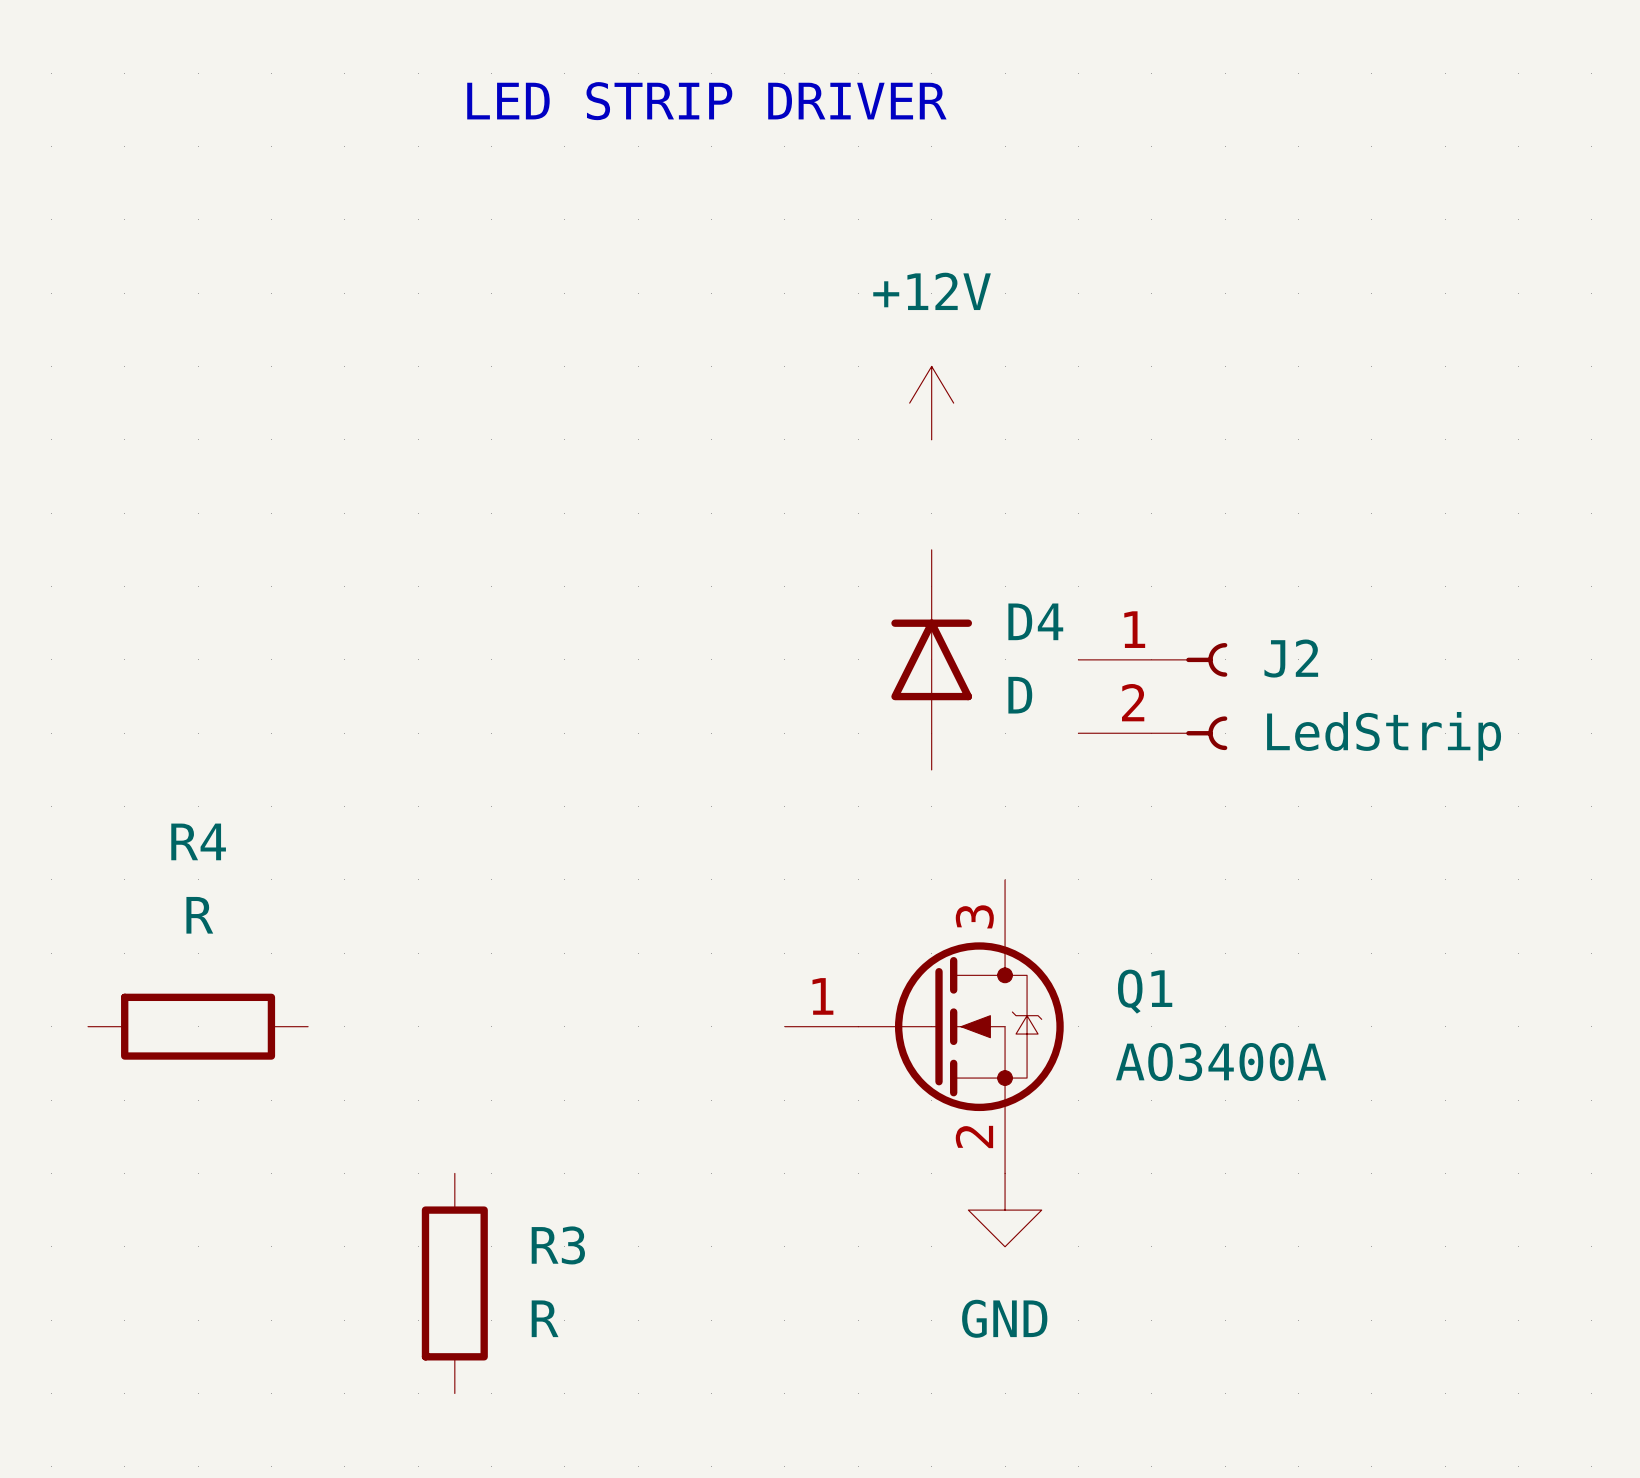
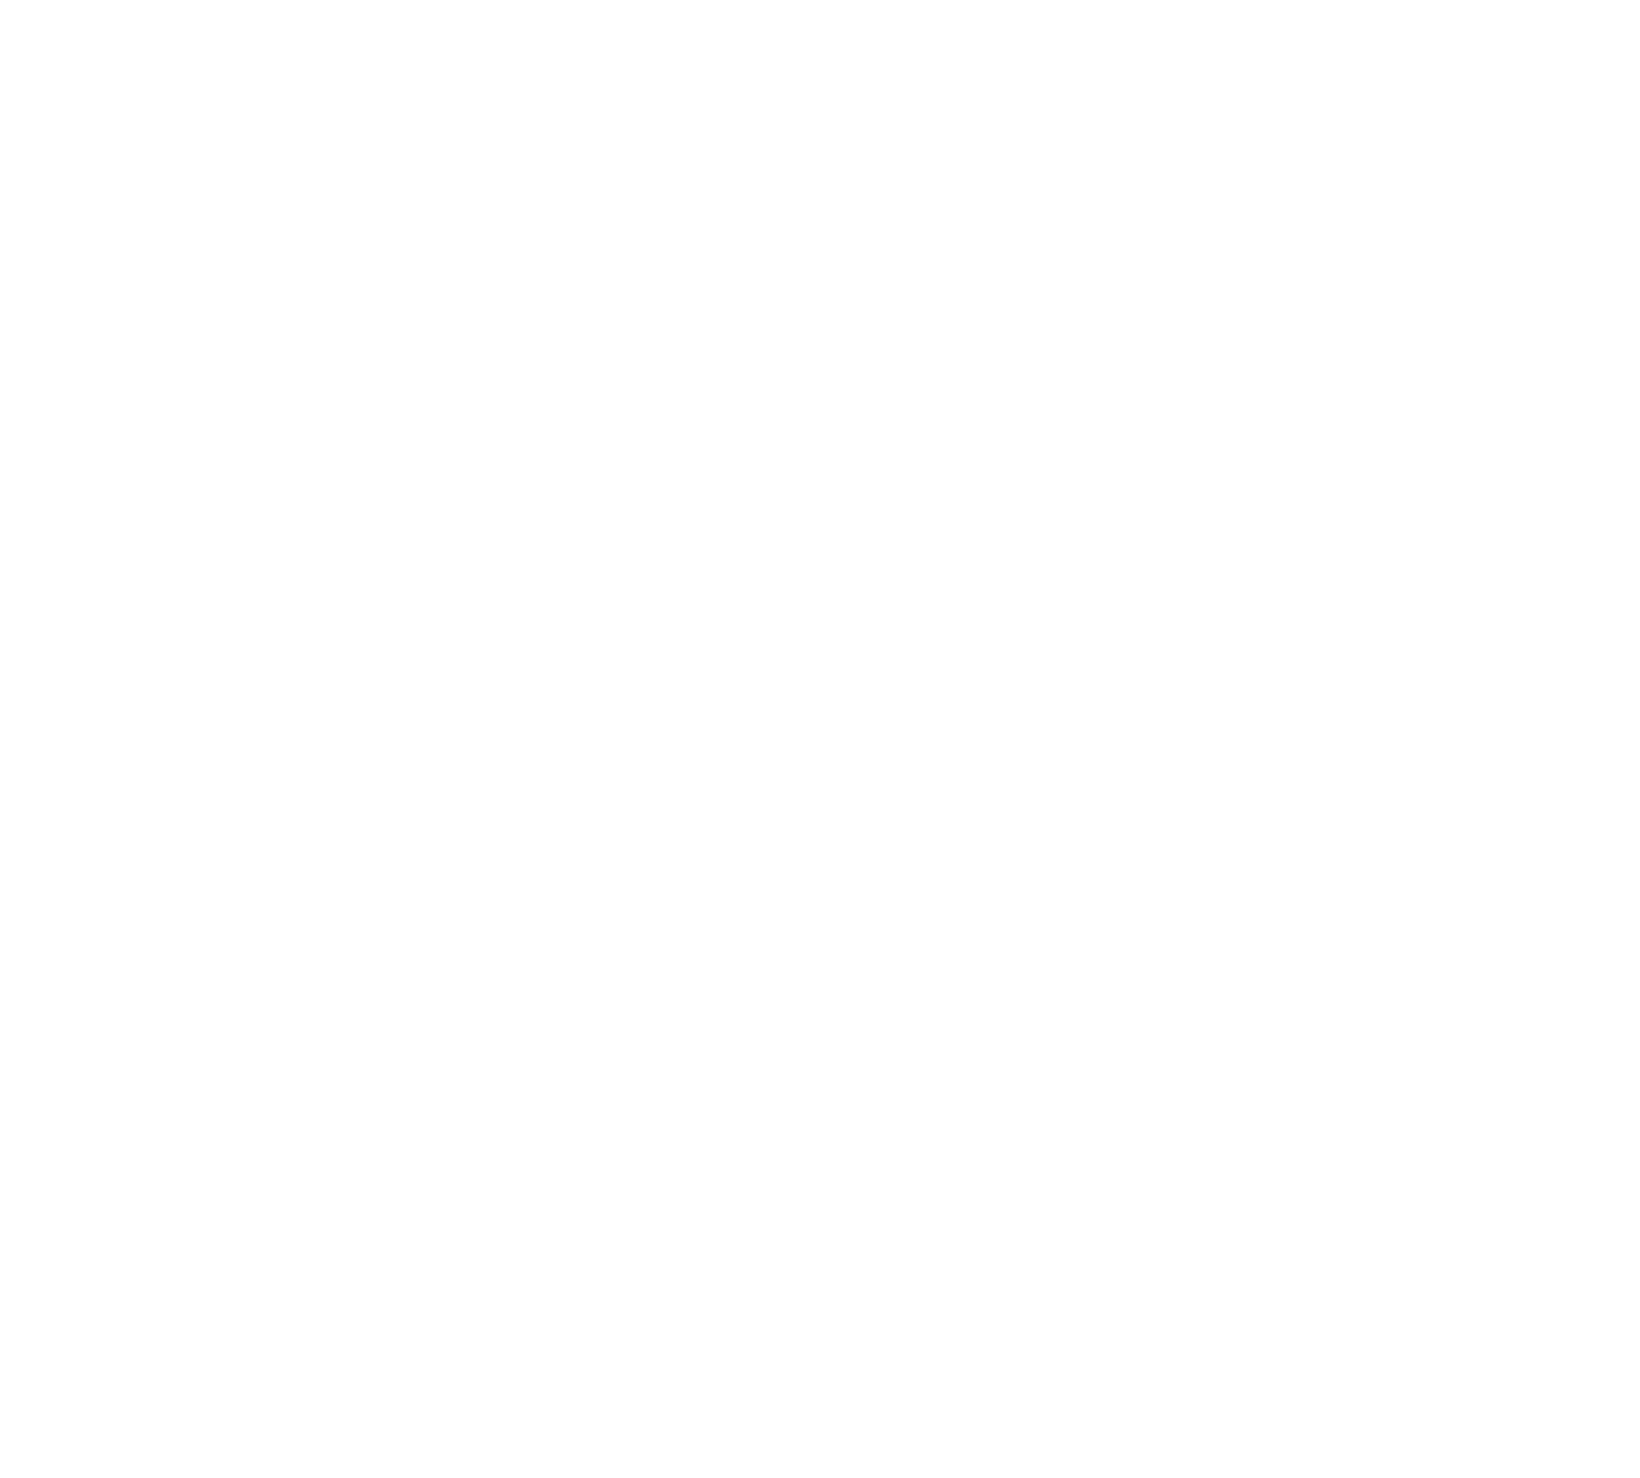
text: LED STRIP DRIVER (706, 101) -> none
power symbol: +12V (931, 403) -> none
D4: D (931, 659) -> none
J2: LedStrip (1152, 696) -> none
R4: R (198, 1026) -> none
Q1: AO3400A (924, 1026) -> none
power symbol: GND (1005, 1210) -> none
R3: R (454, 1283) -> none

